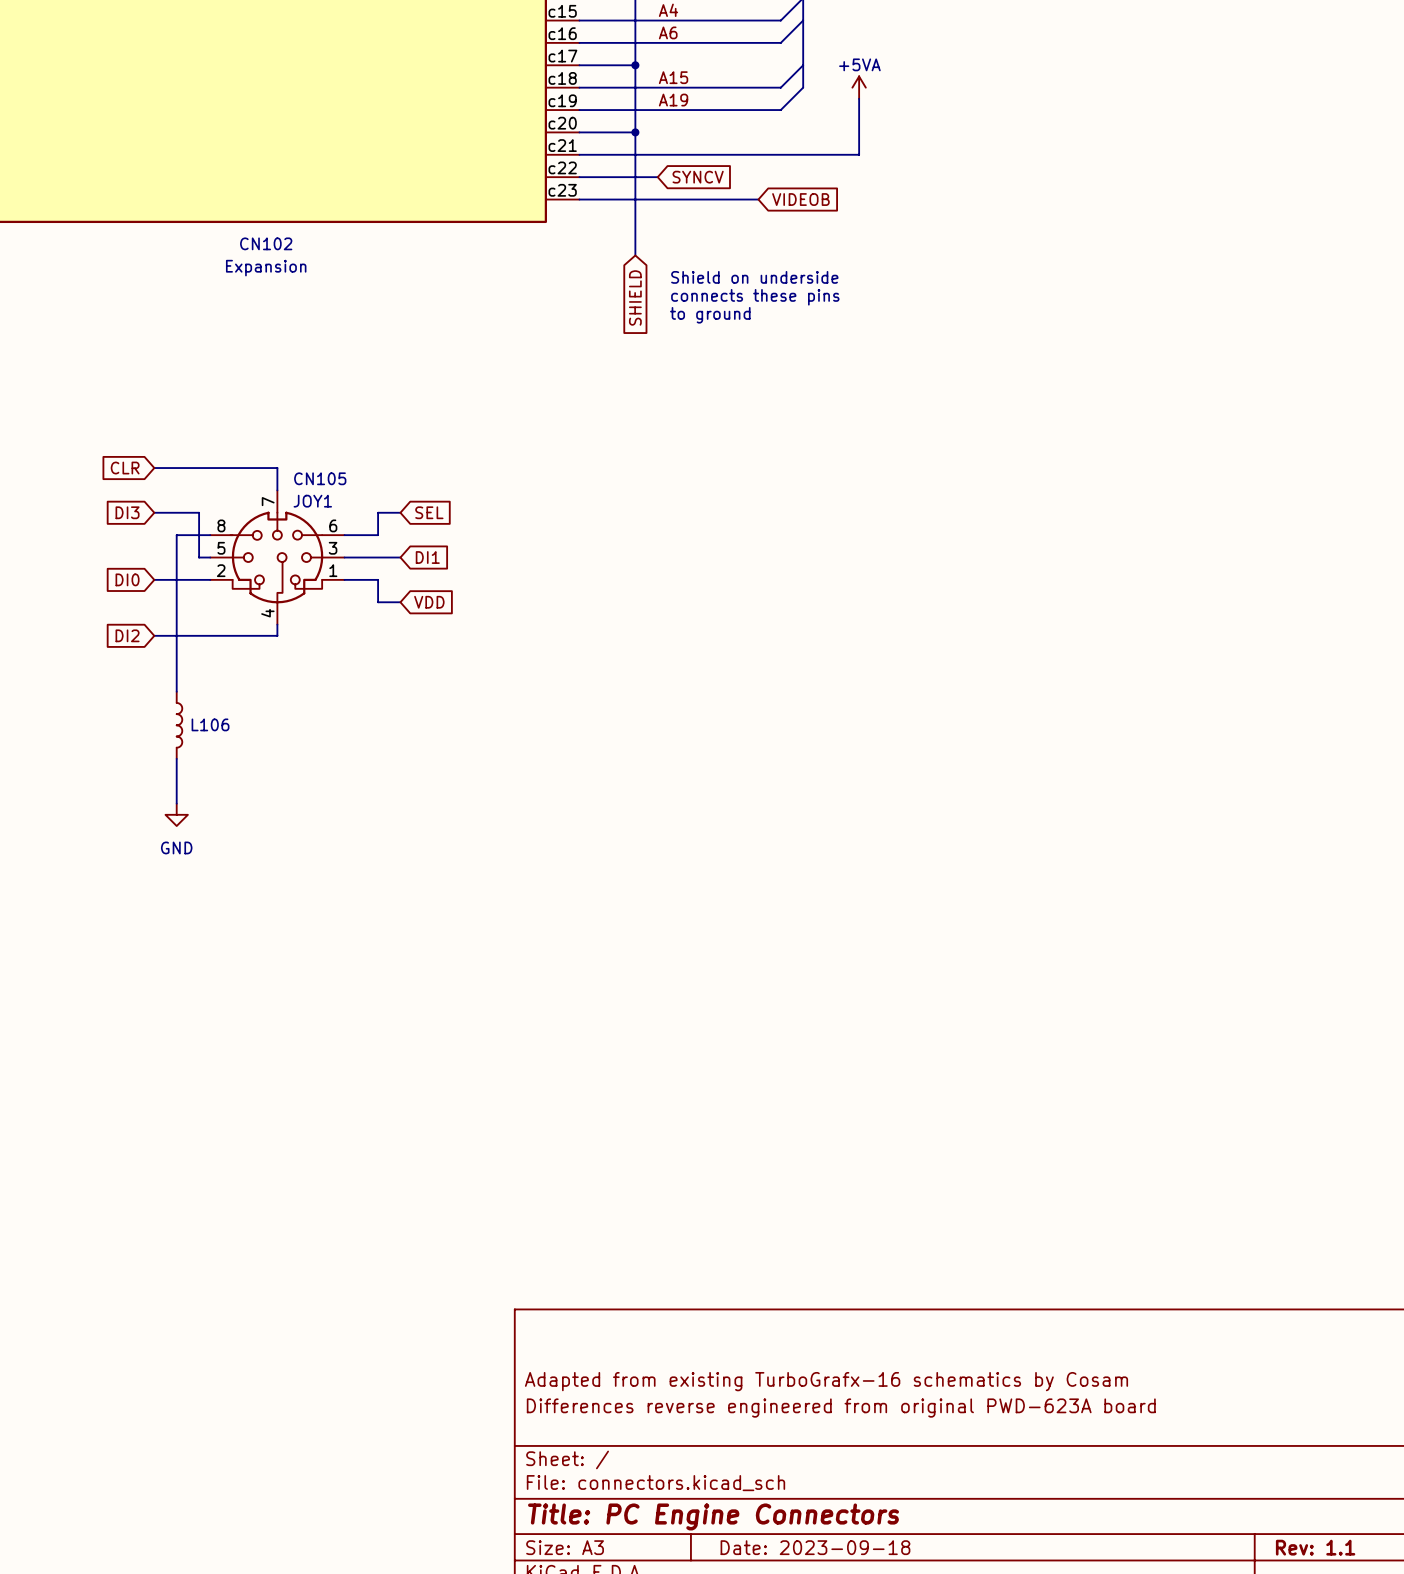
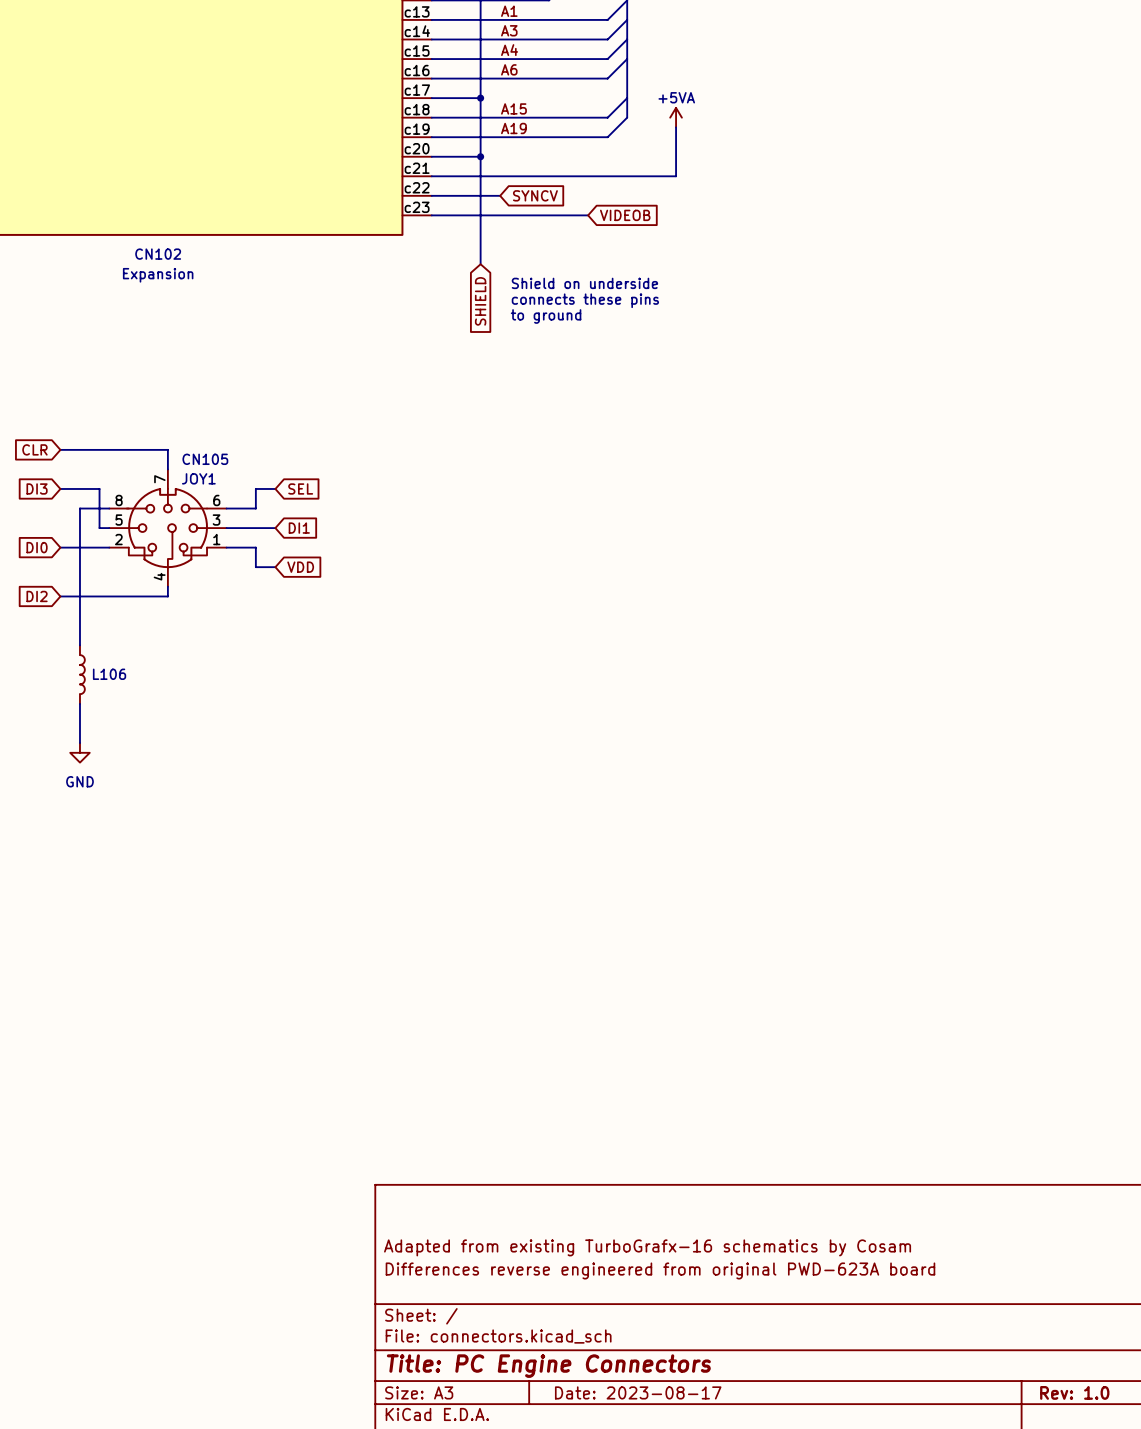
title block: Date: 2023-09-18 (815, 1547) -> Date: 2023-08-17 (638, 1392)
title block: Rev: 1.1 (1315, 1547) -> Rev: 1.0 (1074, 1392)

